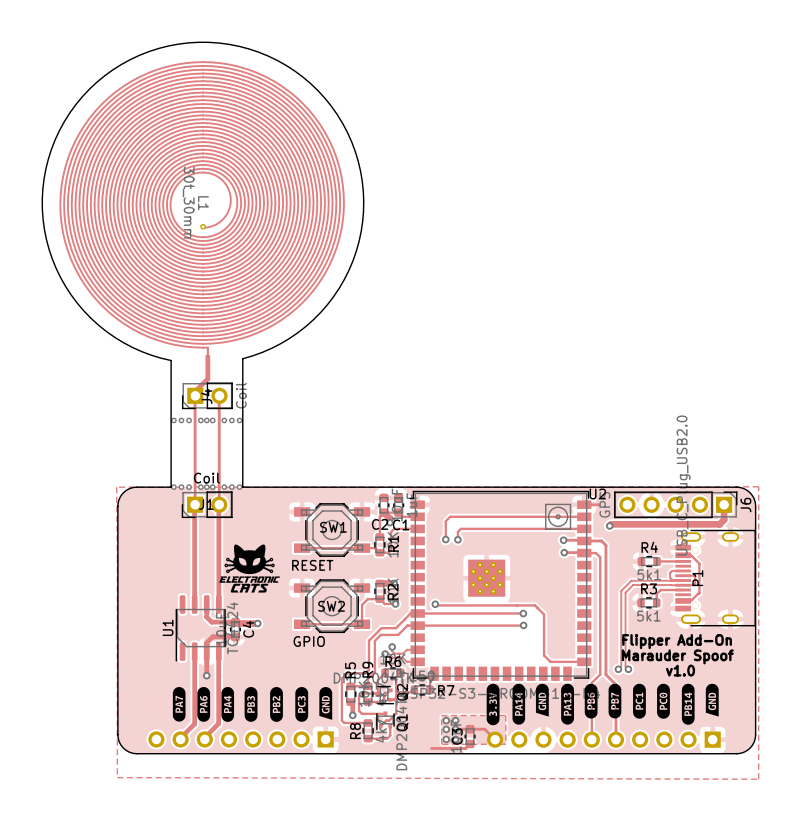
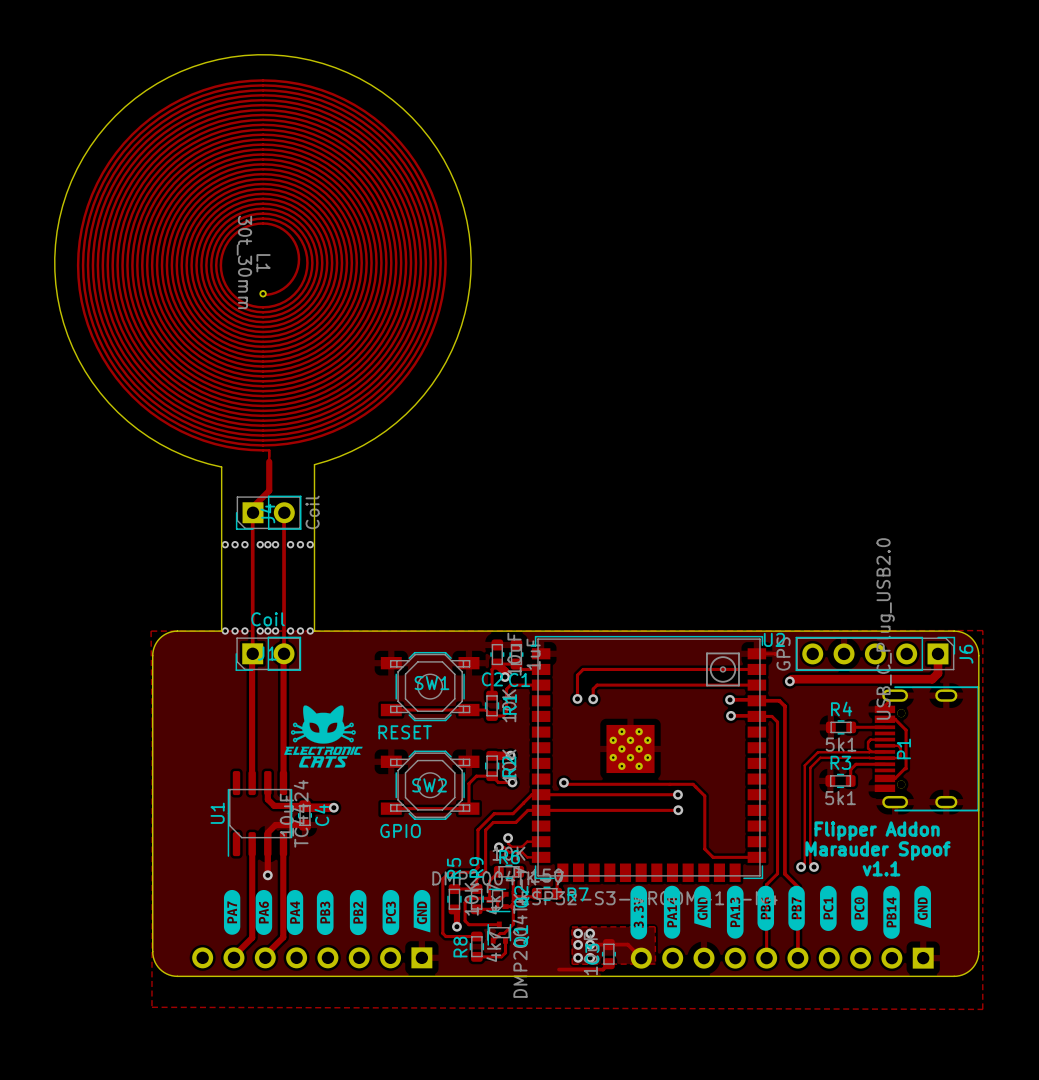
text: Flipper Add-On (677, 641) -> Flipper Addon (877, 831)
text: v1.0 (680, 670) -> v1.1 (881, 868)

